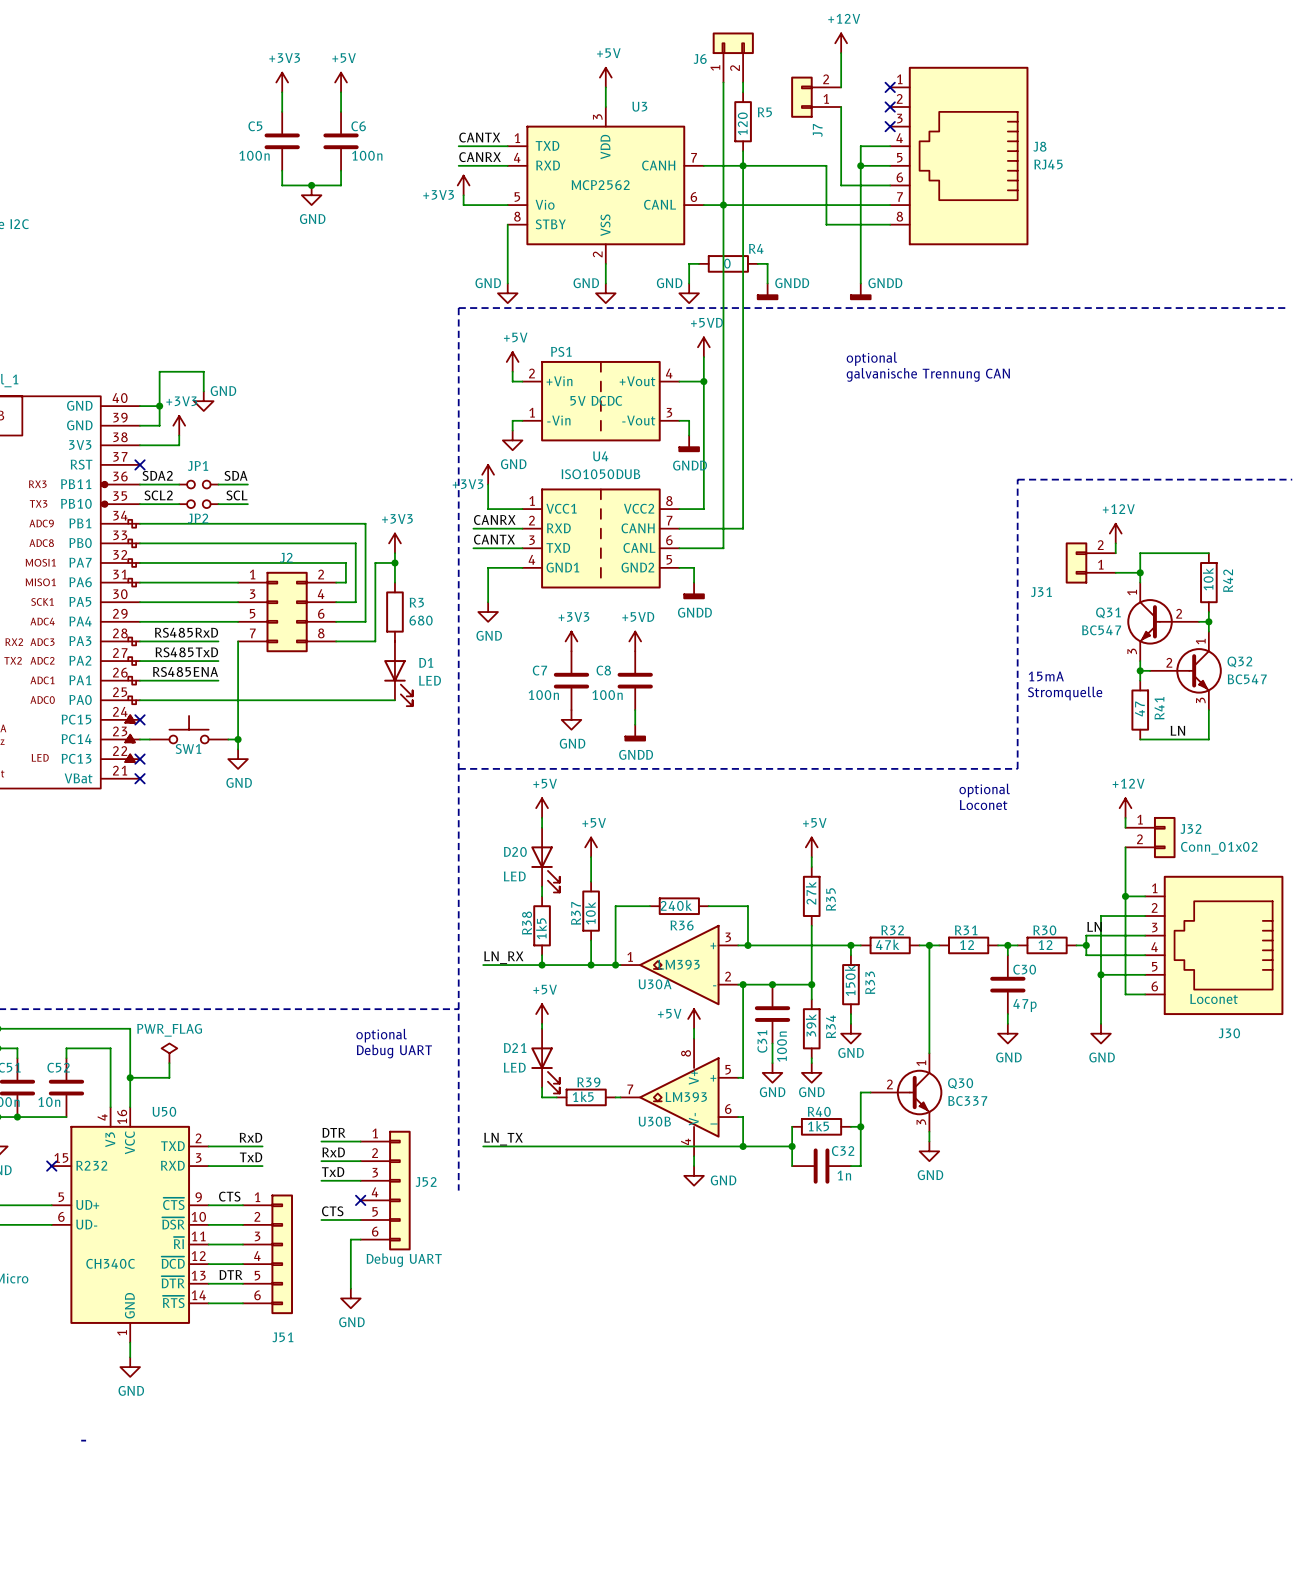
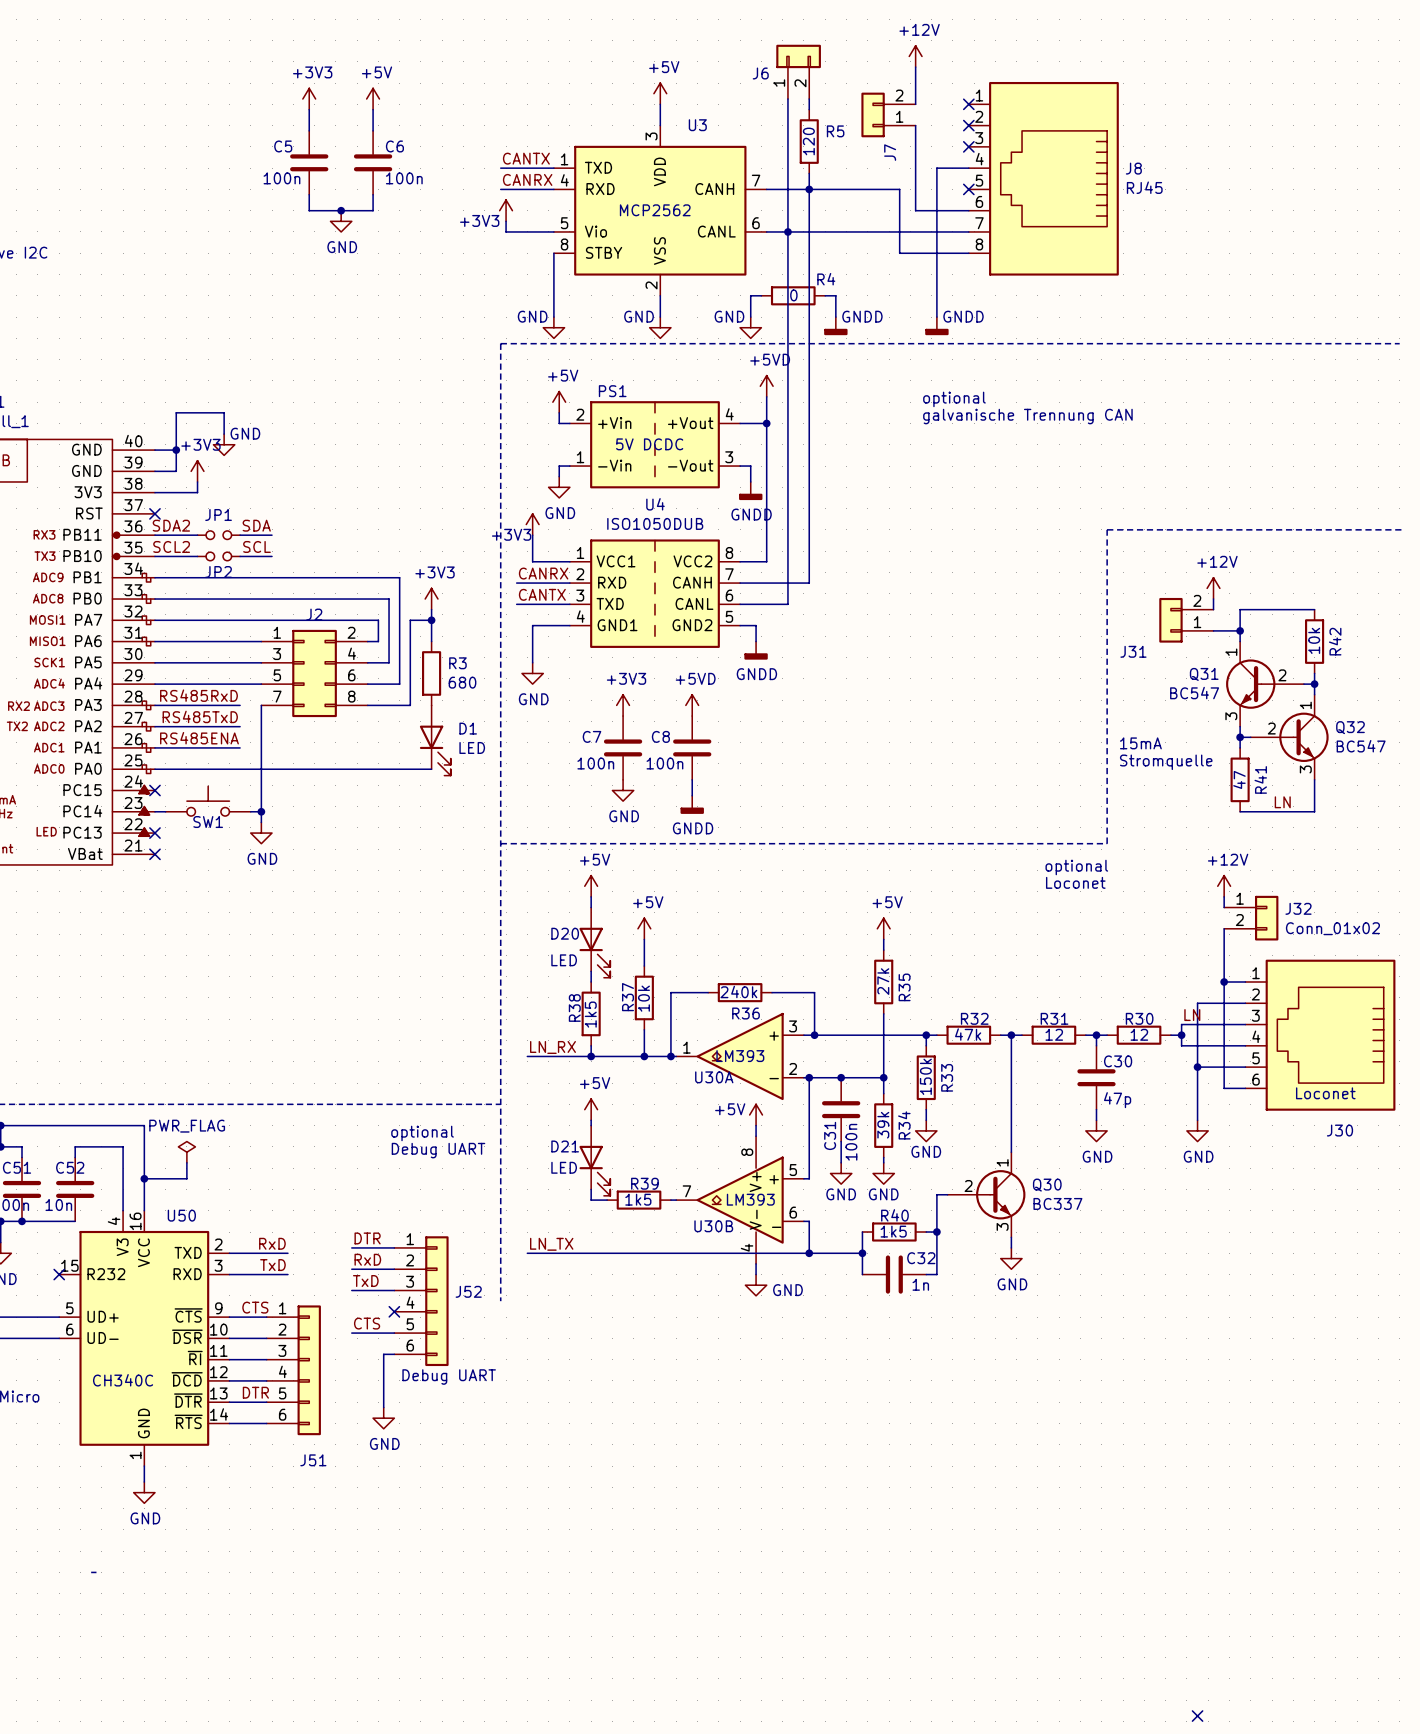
wire: (860, 165) (890, 165) -> none
junction: (860, 165) -> none
no-connect mark: none -> (968, 189)
no-connect mark: none -> (1197, 1716)

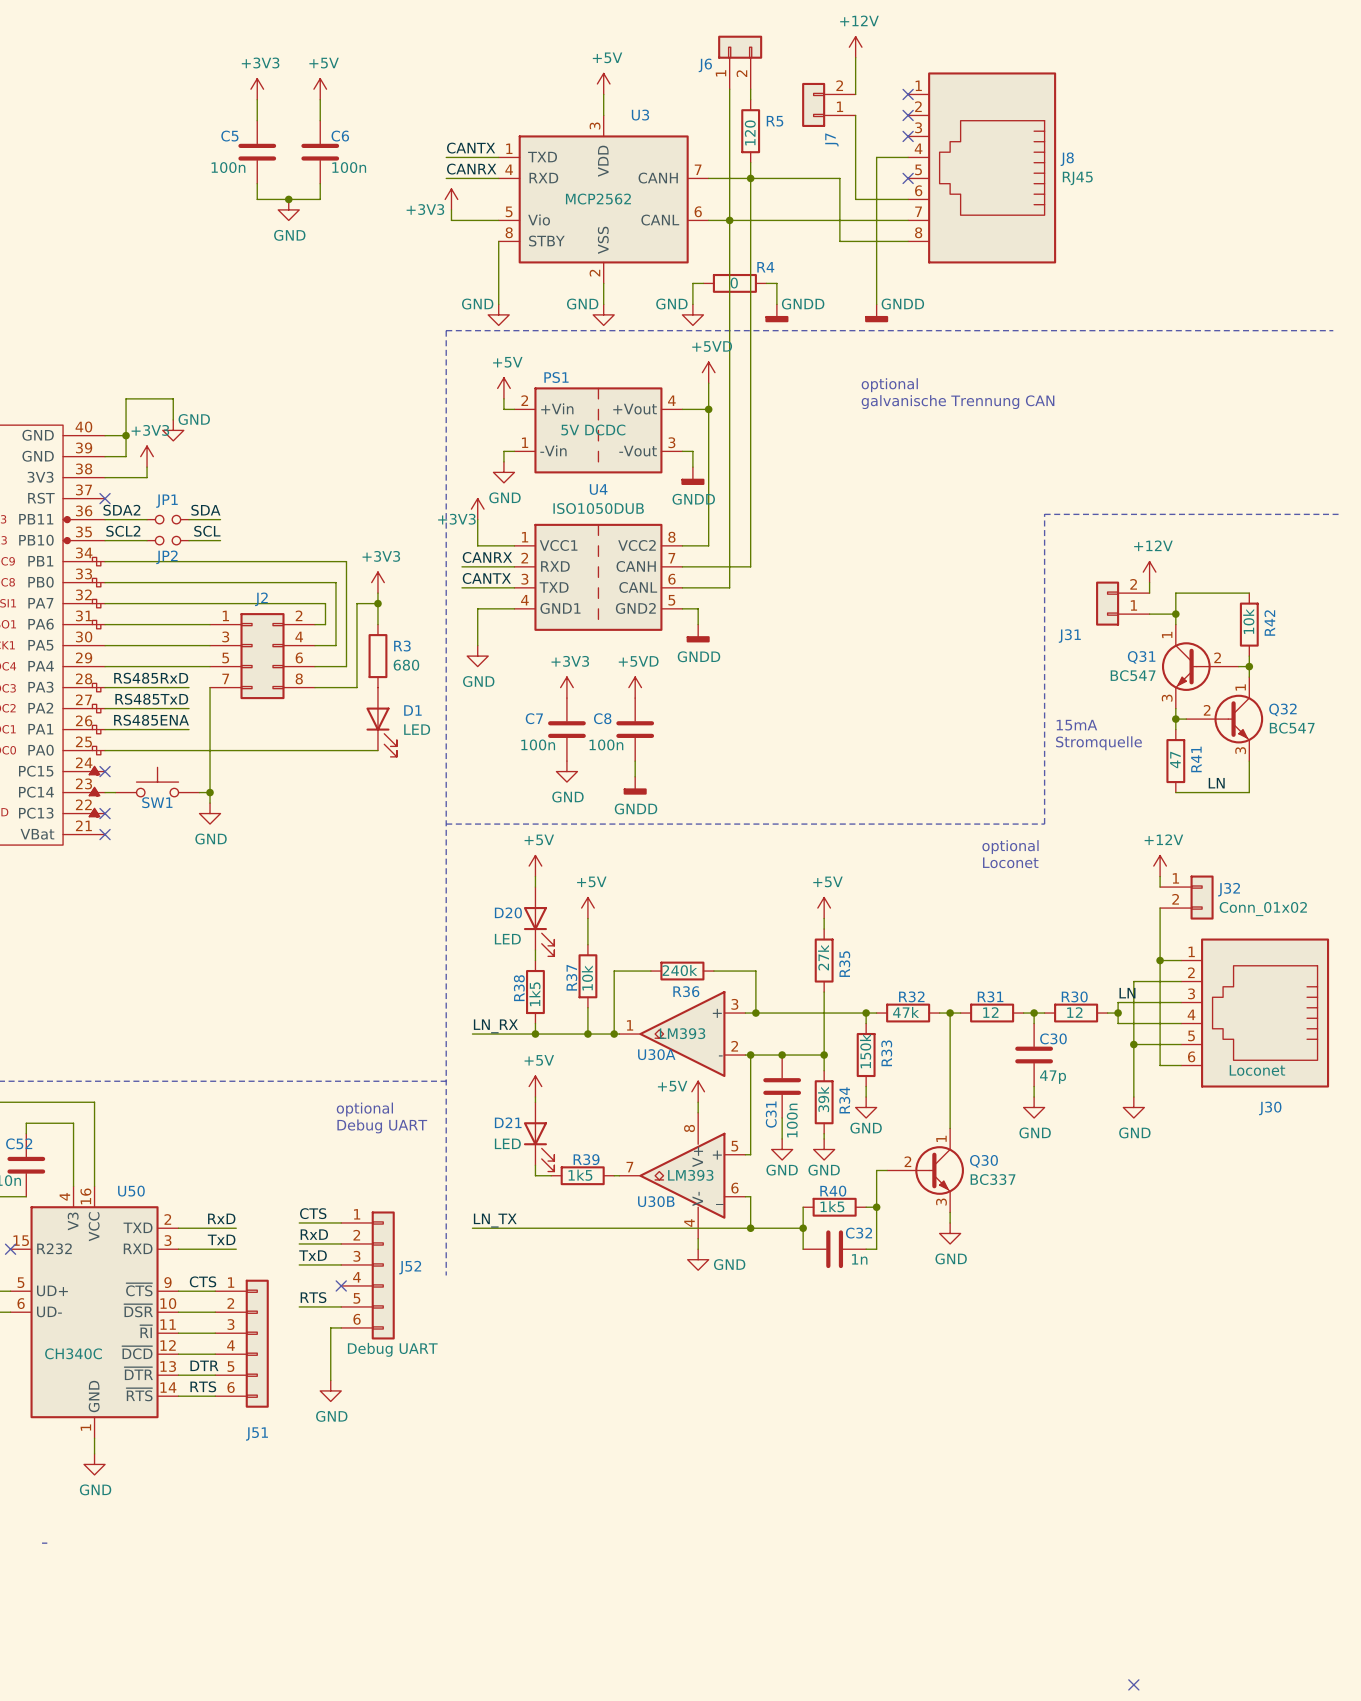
power symbol: PWR_FLAG (186, 1152) -> none
wire: (186, 1162) (186, 1178) (144, 1178) -> none
junction: (144, 1178) -> none
label: DTR (367, 1238) -> CTS (313, 1213)
label: CTS (367, 1323) -> RTS (313, 1297)
label: none -> RTS (203, 1386)

